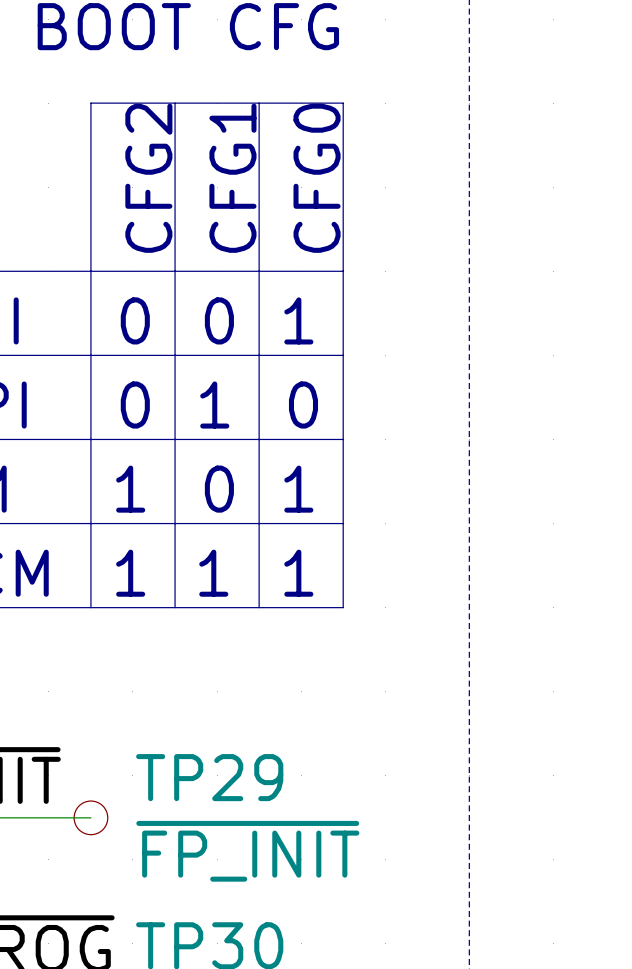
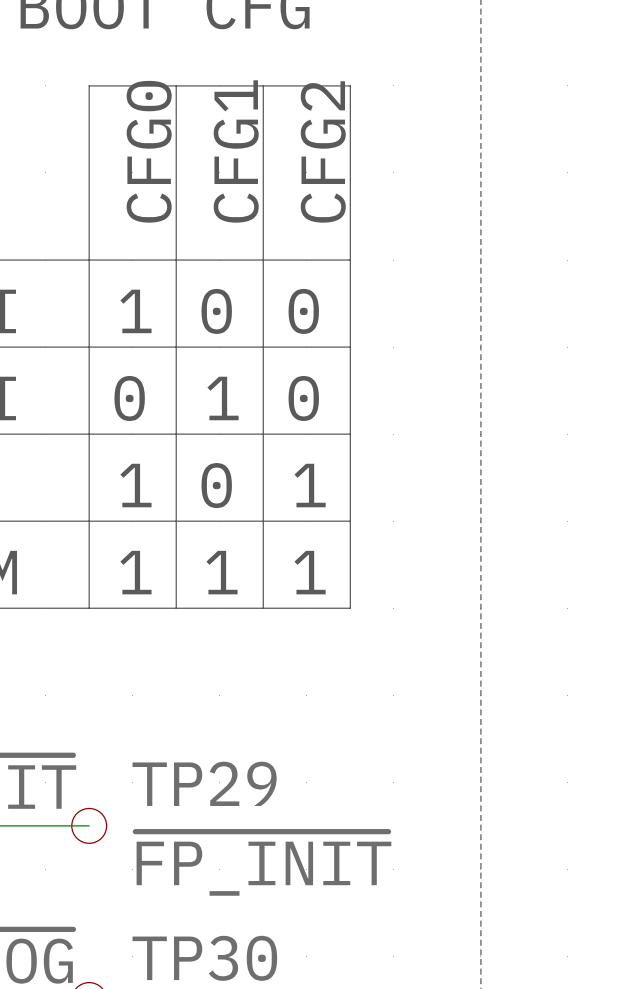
text: CFG2 (148, 178) -> CFG0 (149, 151)
text: CFG0 (317, 178) -> CFG2 (323, 151)
text position: 0 (135, 320) -> 0 (303, 311)
text position: 1 (298, 320) -> 1 (135, 311)

